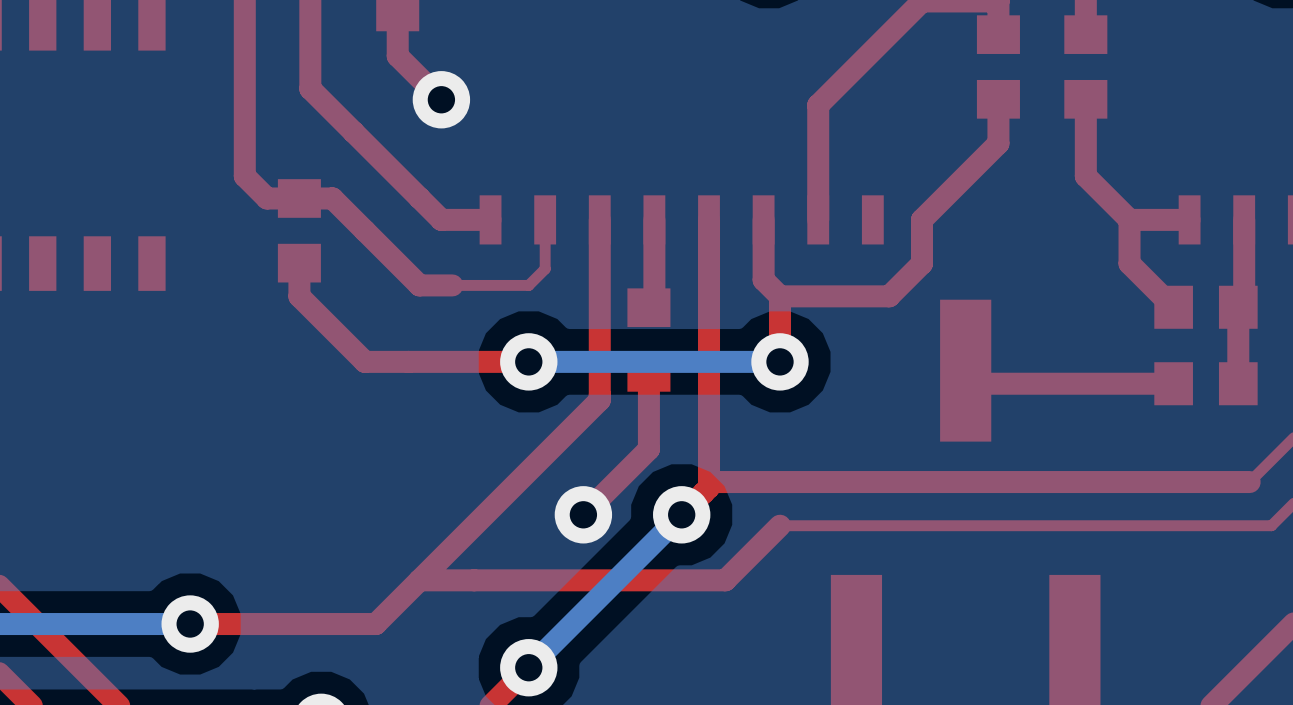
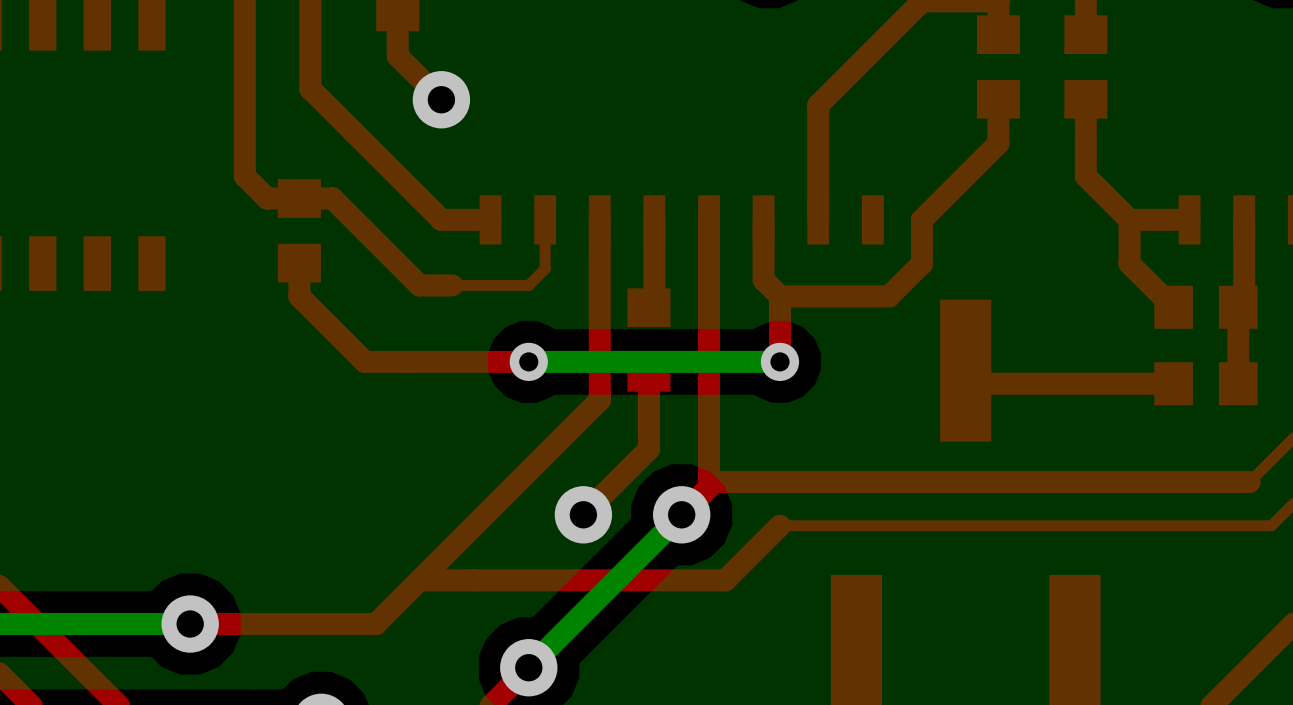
via size: [500, 333, 558, 391] -> [509, 342, 548, 382]
via size: [751, 333, 809, 391] -> [760, 342, 800, 382]

